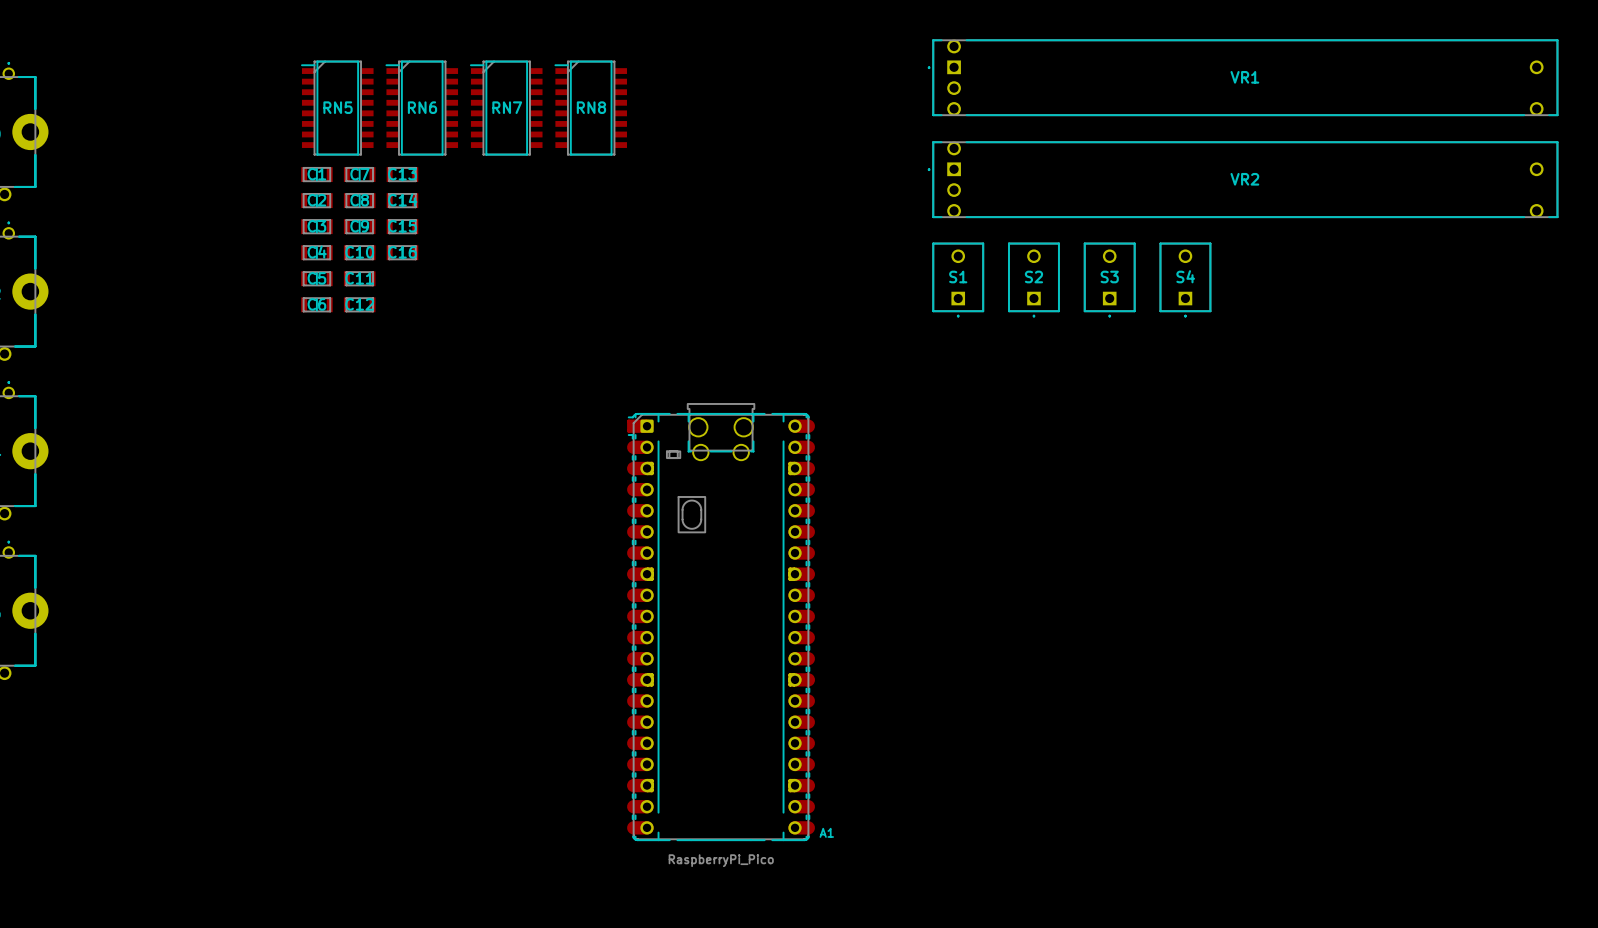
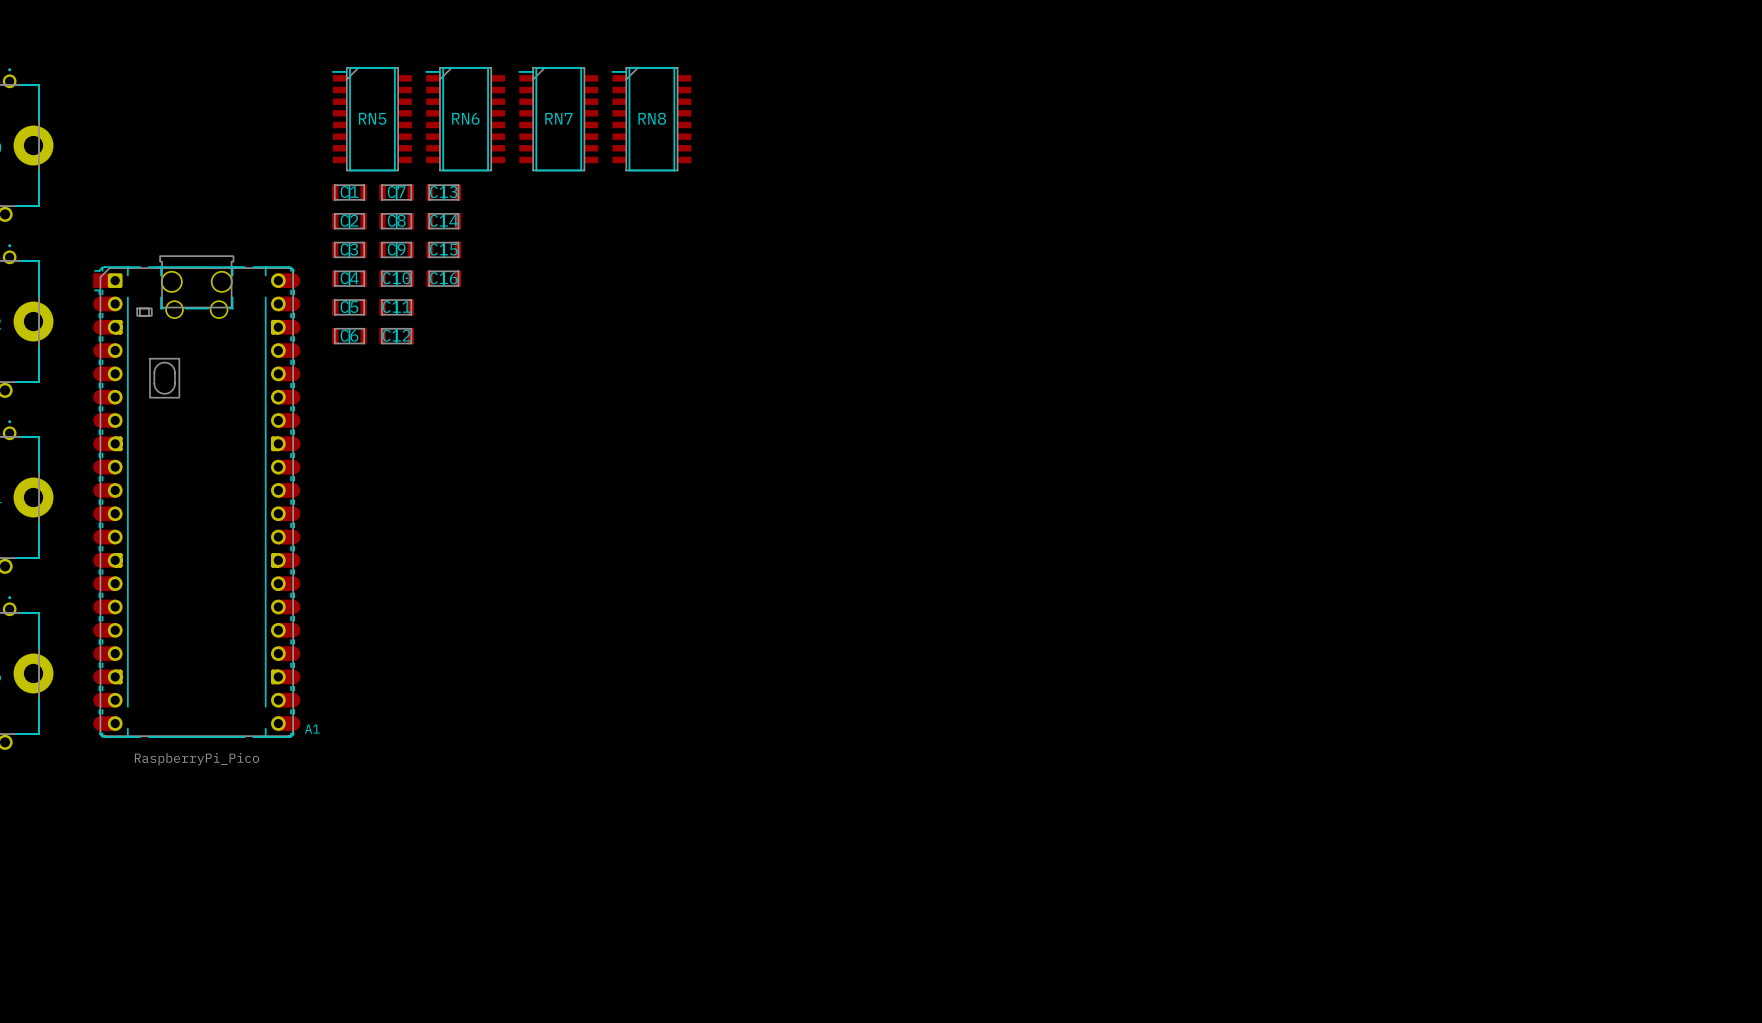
VR1: (1243, 77) -> none
VR2: (1243, 179) -> none
S1: (958, 279) -> none
S2: (1033, 279) -> none
S3: (1109, 279) -> none
S4: (1185, 279) -> none
A1 position: (721, 622) -> (196, 496)

